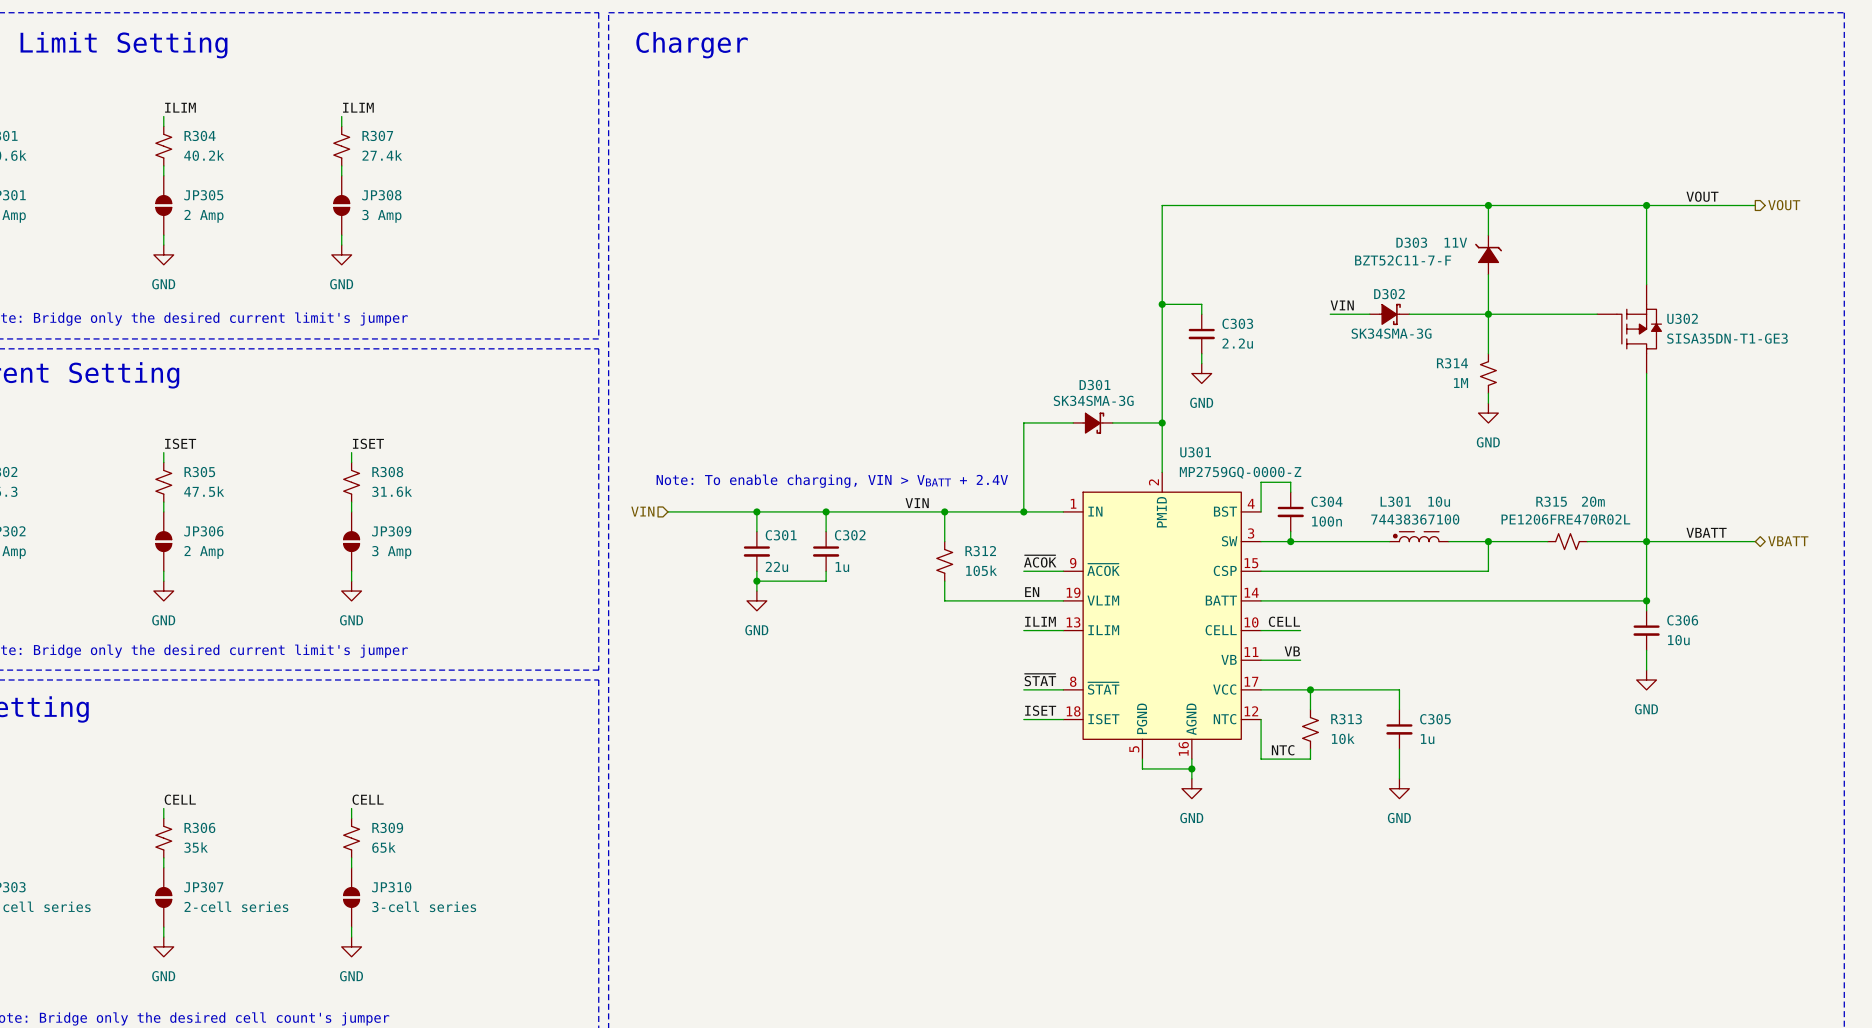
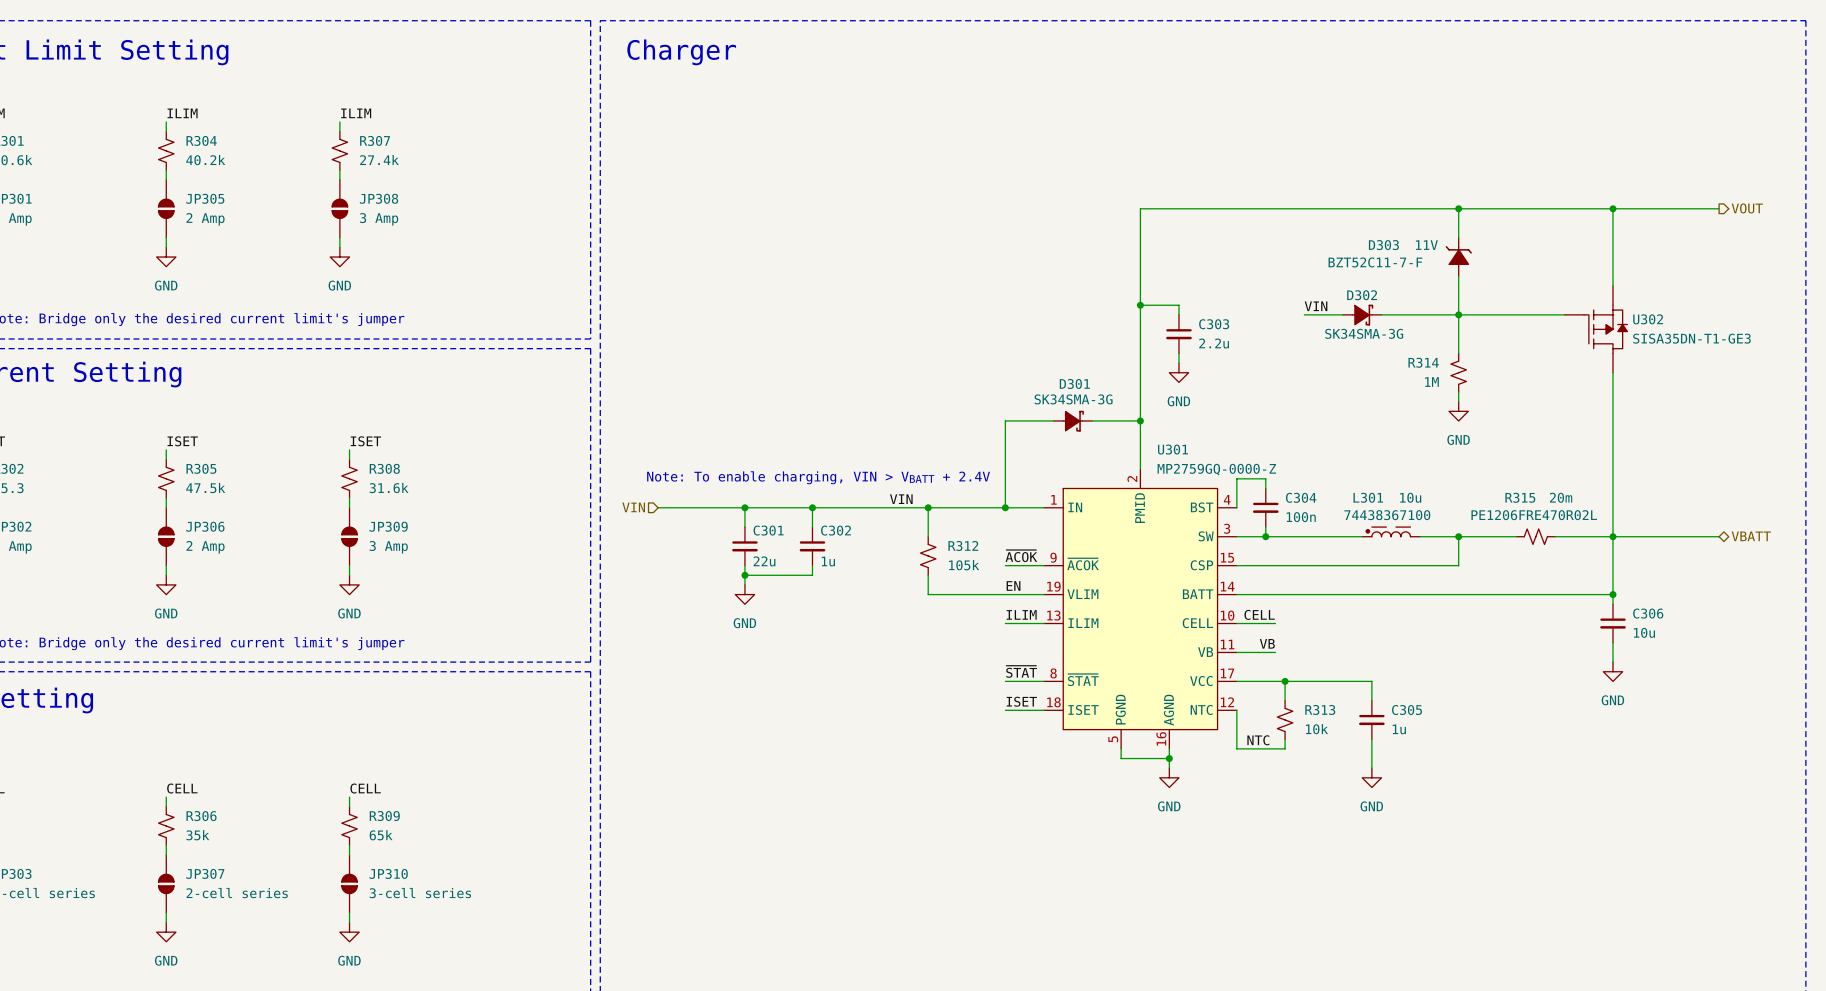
label: VOUT (1702, 196) -> none
label: VBATT (1706, 532) -> none

